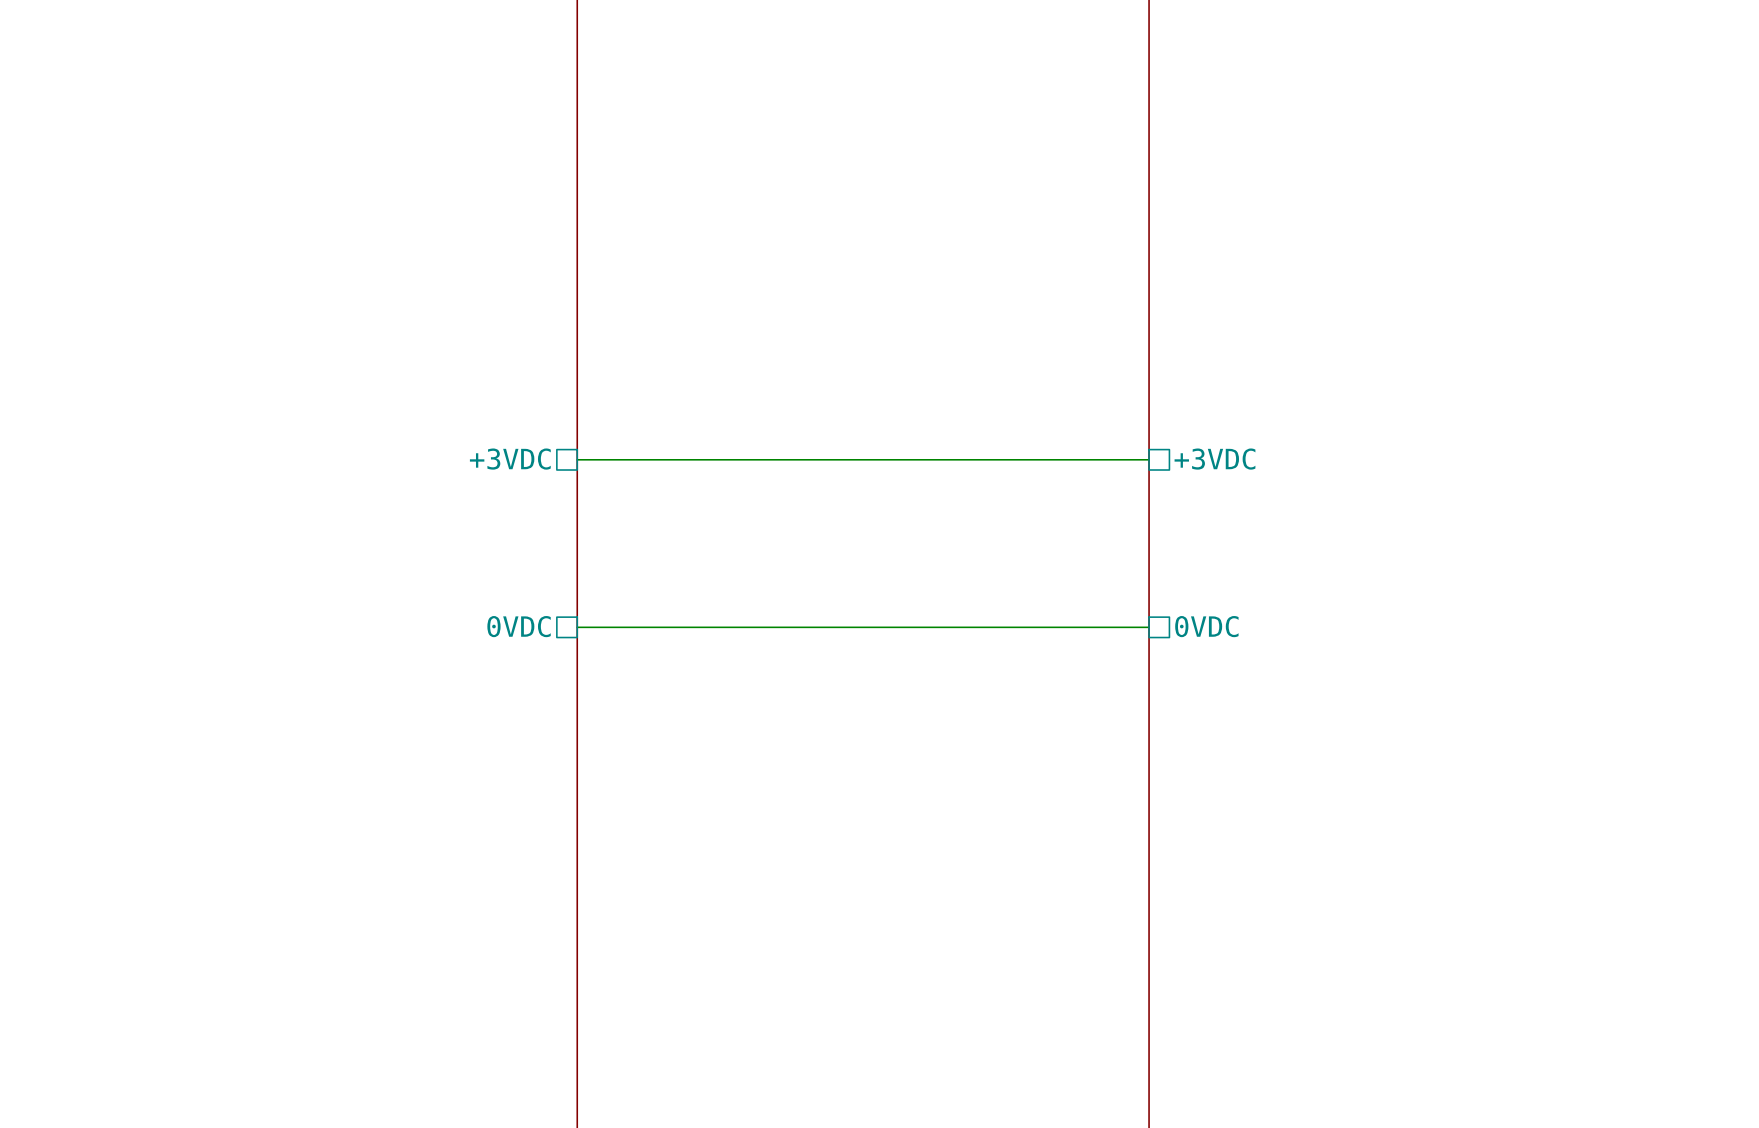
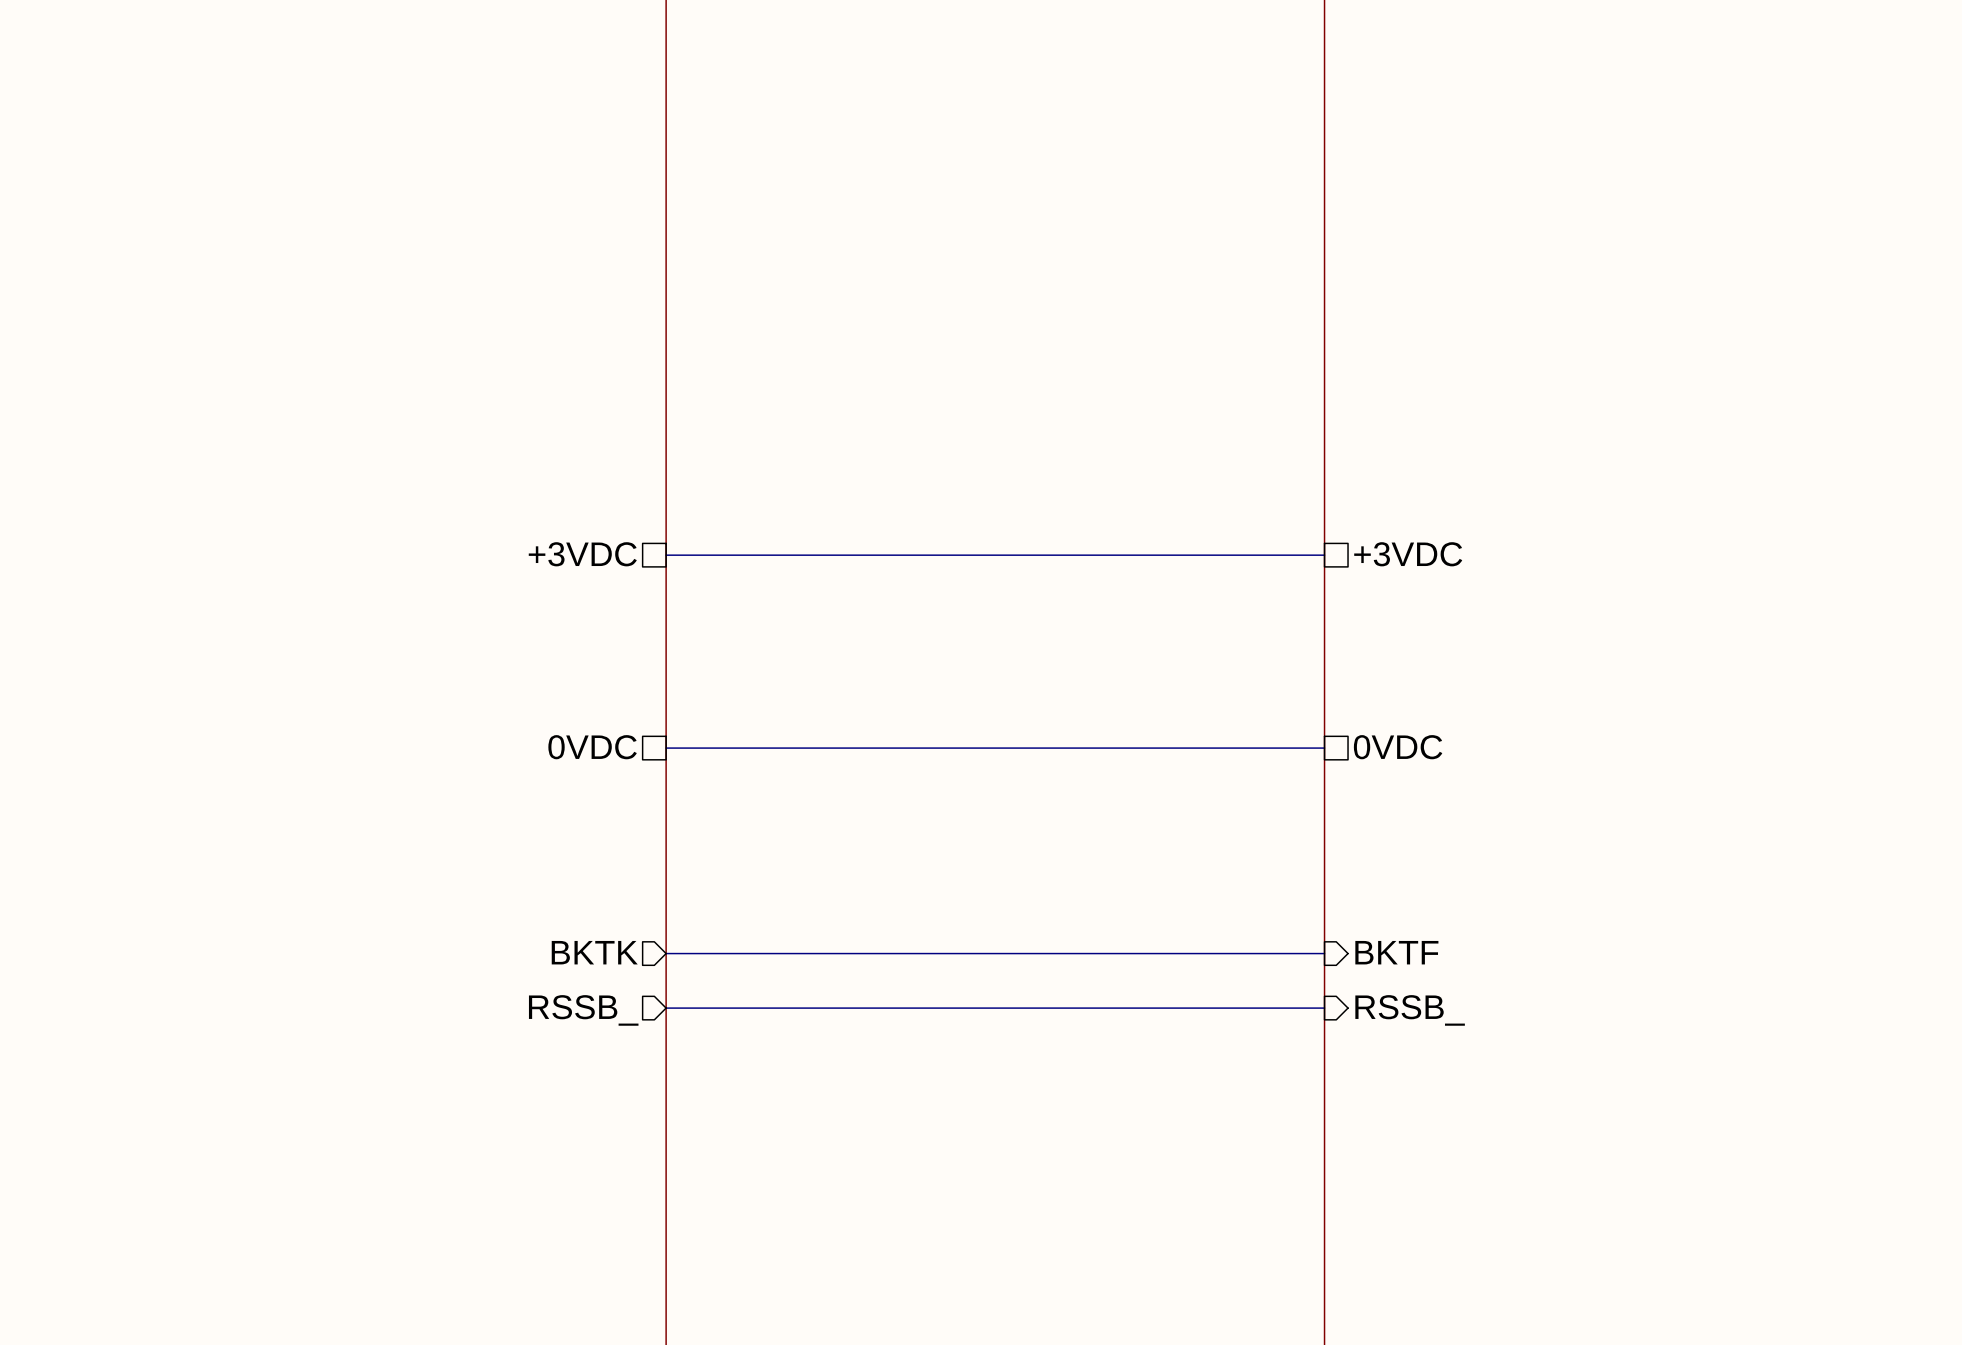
sheet pin: none -> BKTK (594, 952)
wire: none -> (666, 953) (1324, 953)
sheet pin: none -> BKTF (1396, 952)
wire: none -> (666, 1008) (1324, 1008)
sheet pin: none -> RSSB_ (583, 1010)
sheet pin: none -> RSSB_ (1410, 1010)

